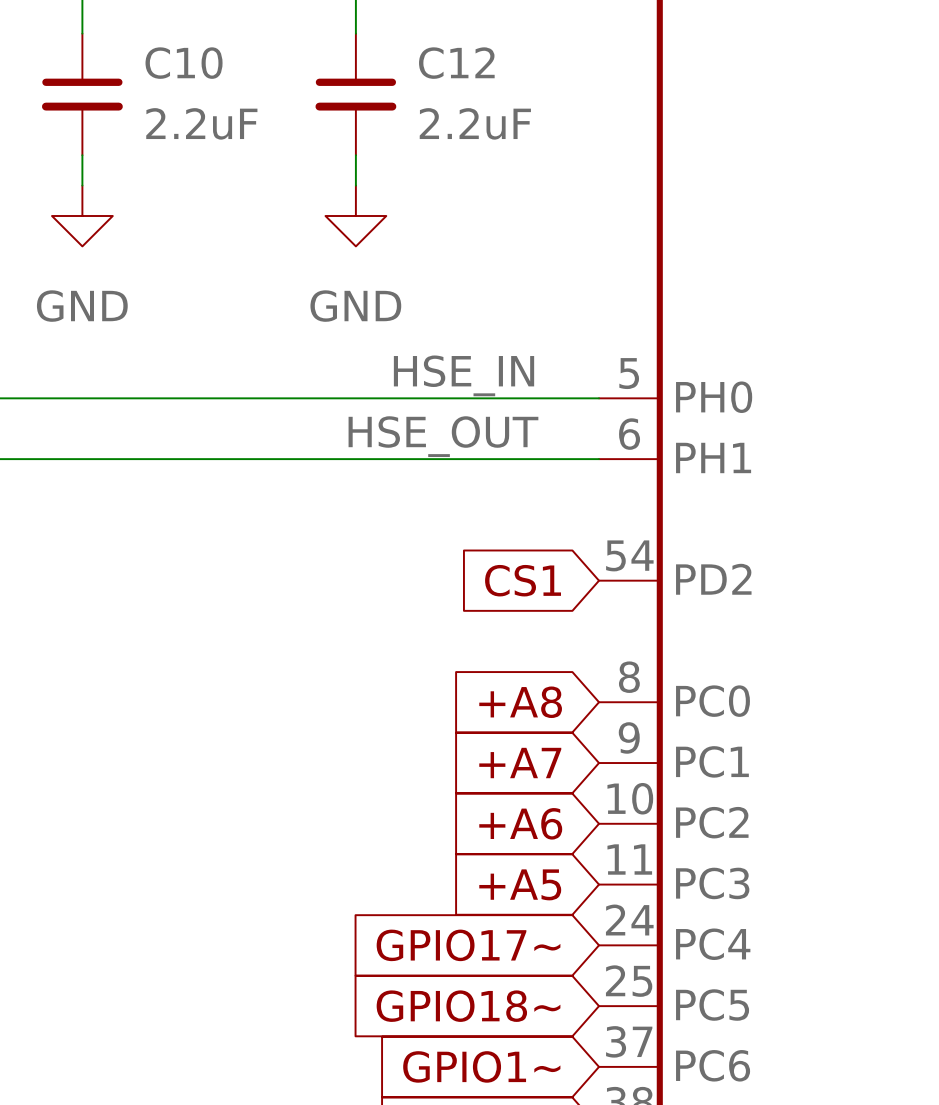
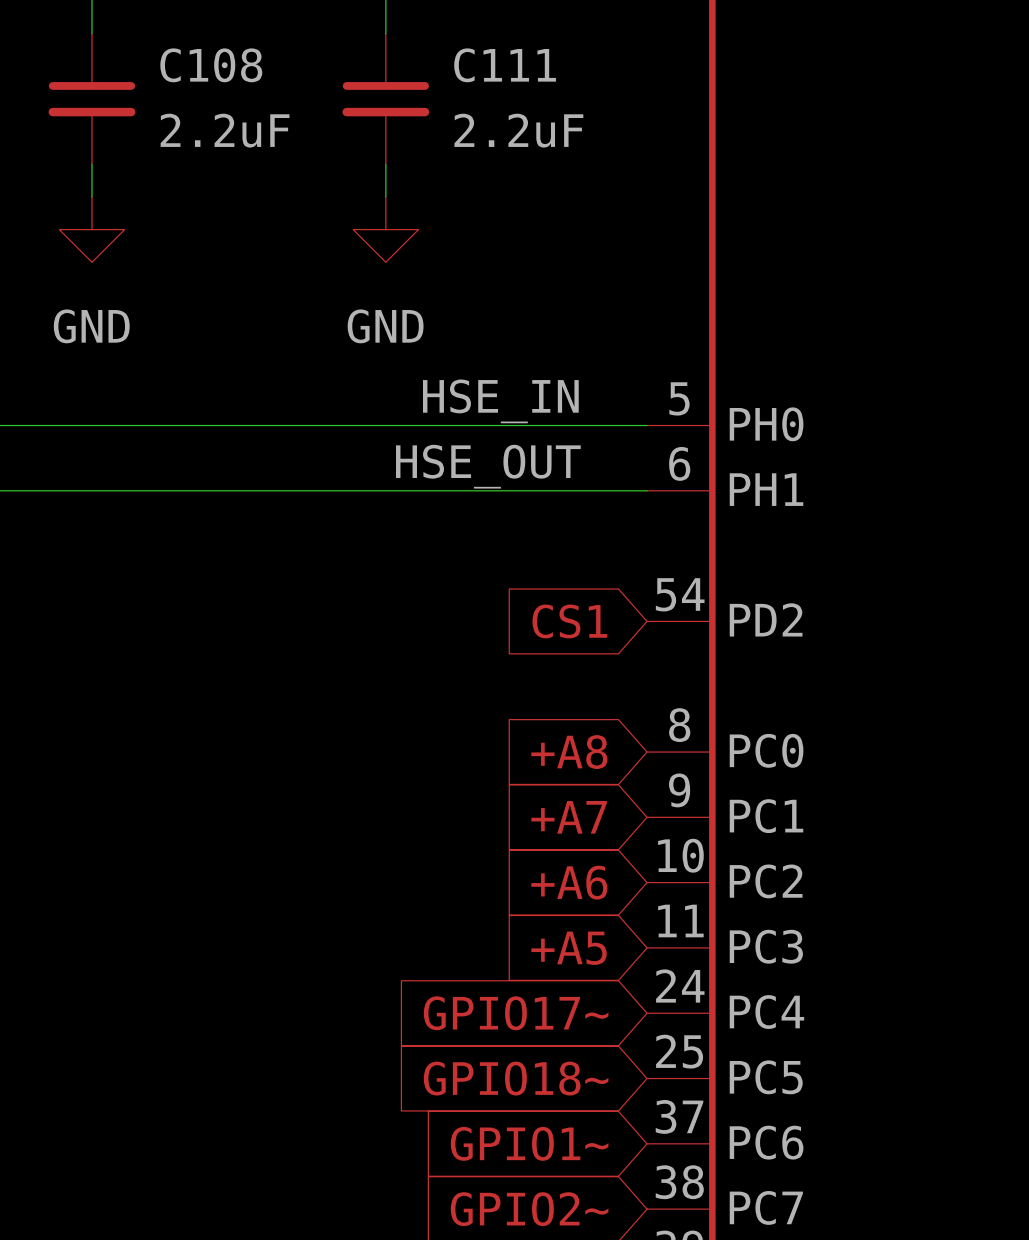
C10 name: C10 (184, 63) -> C108 (211, 65)
C12 name: C12 (456, 63) -> C111 (505, 65)

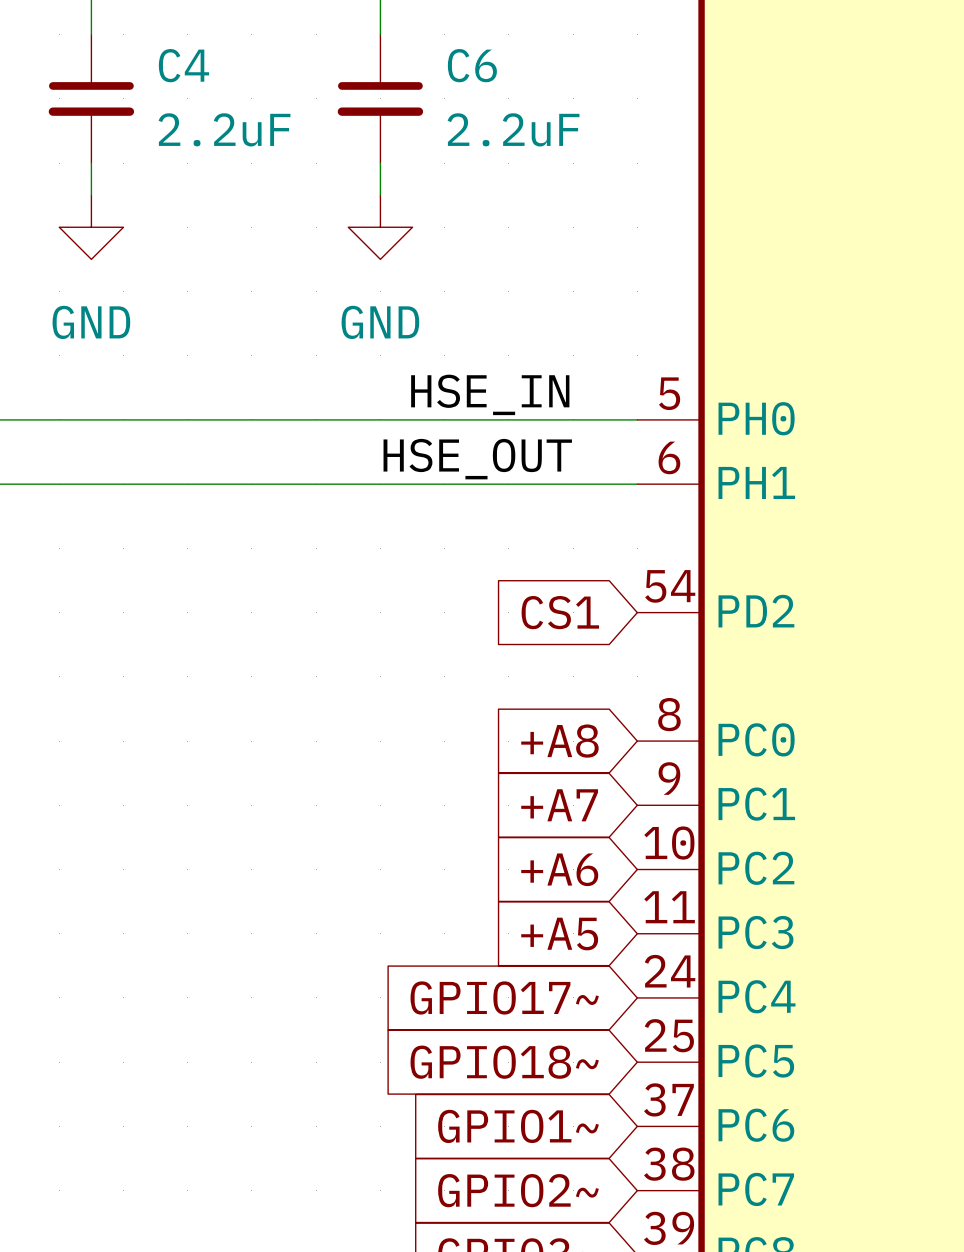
C108 name: C108 (211, 65) -> C4 (183, 65)
C111 name: C111 (505, 65) -> C6 (472, 65)

